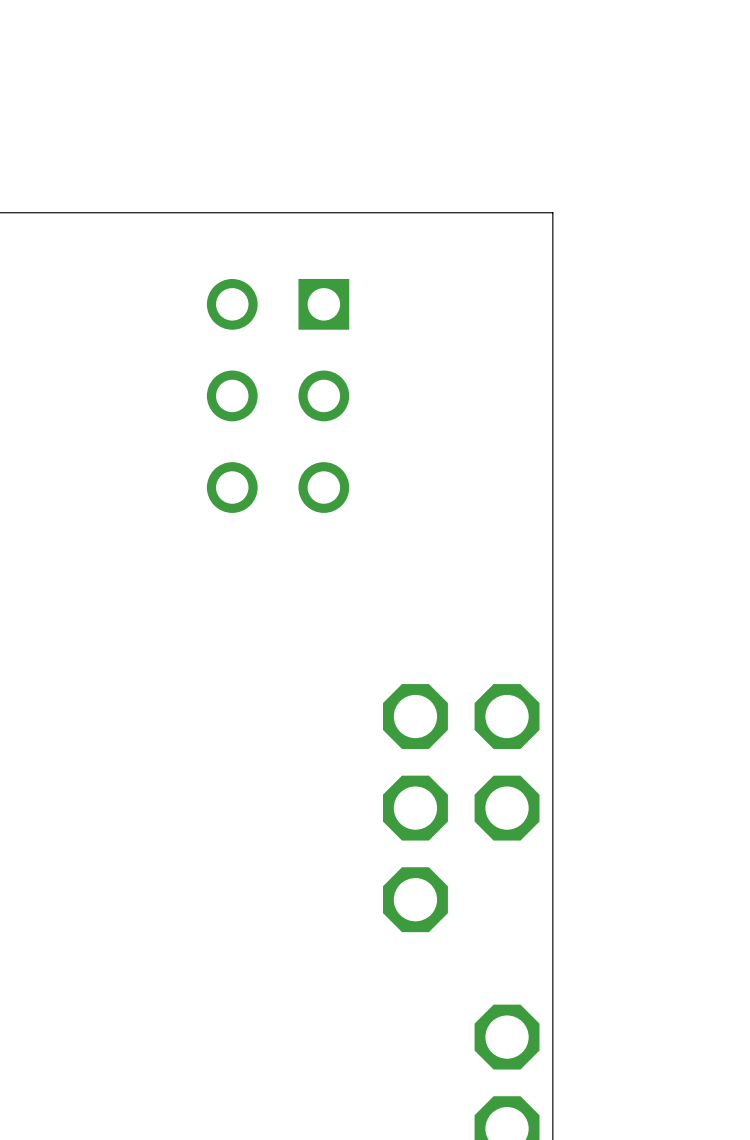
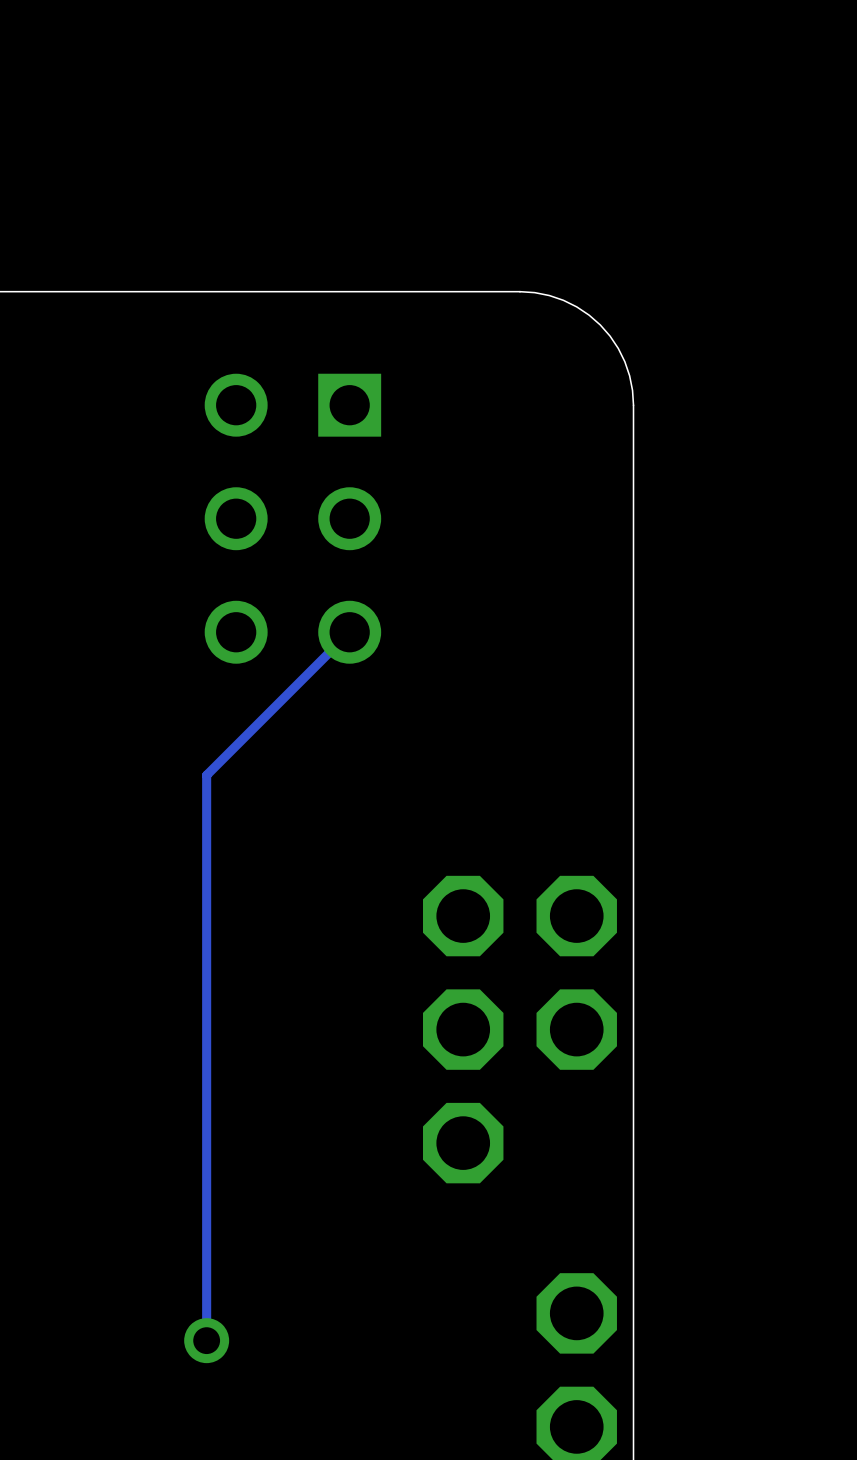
board edge: (461, 212) (552, 212) (552, 304) -> (519, 291) (549, 295) (563, 300) (589, 315) (600, 324) (610, 336) (624, 361) (629, 375) (633, 405)
track: none -> (349, 632) (206, 775) (206, 1340)
via: none -> (206, 1340)

